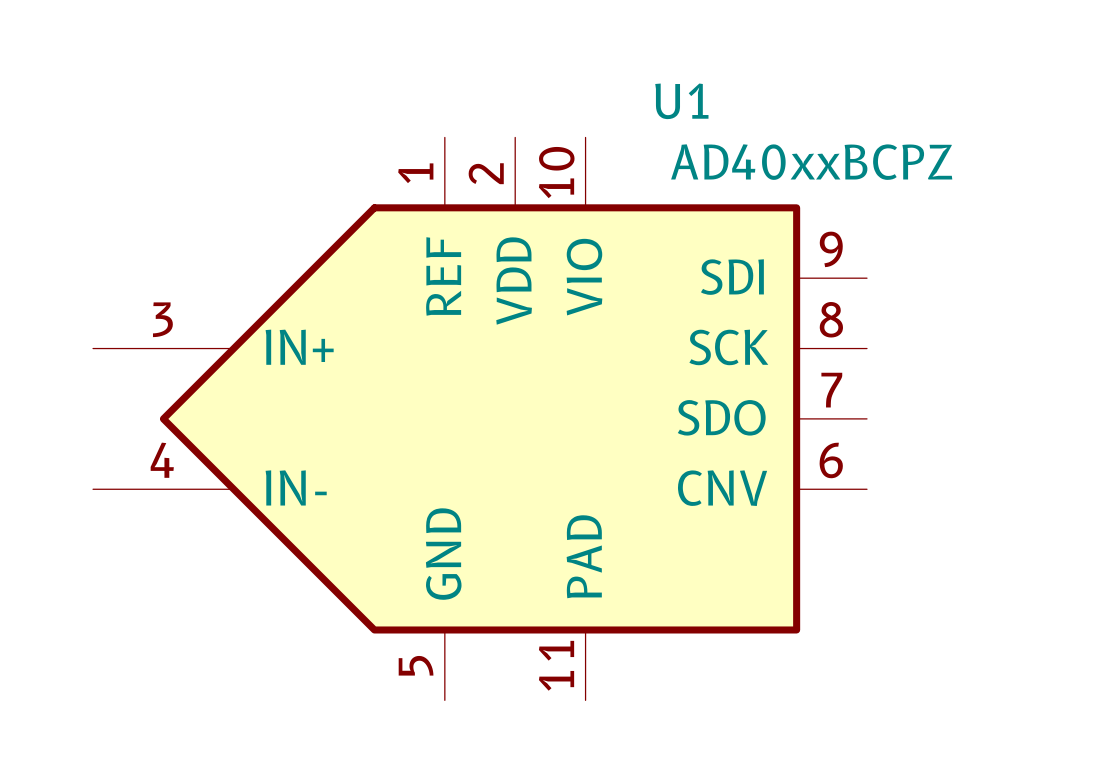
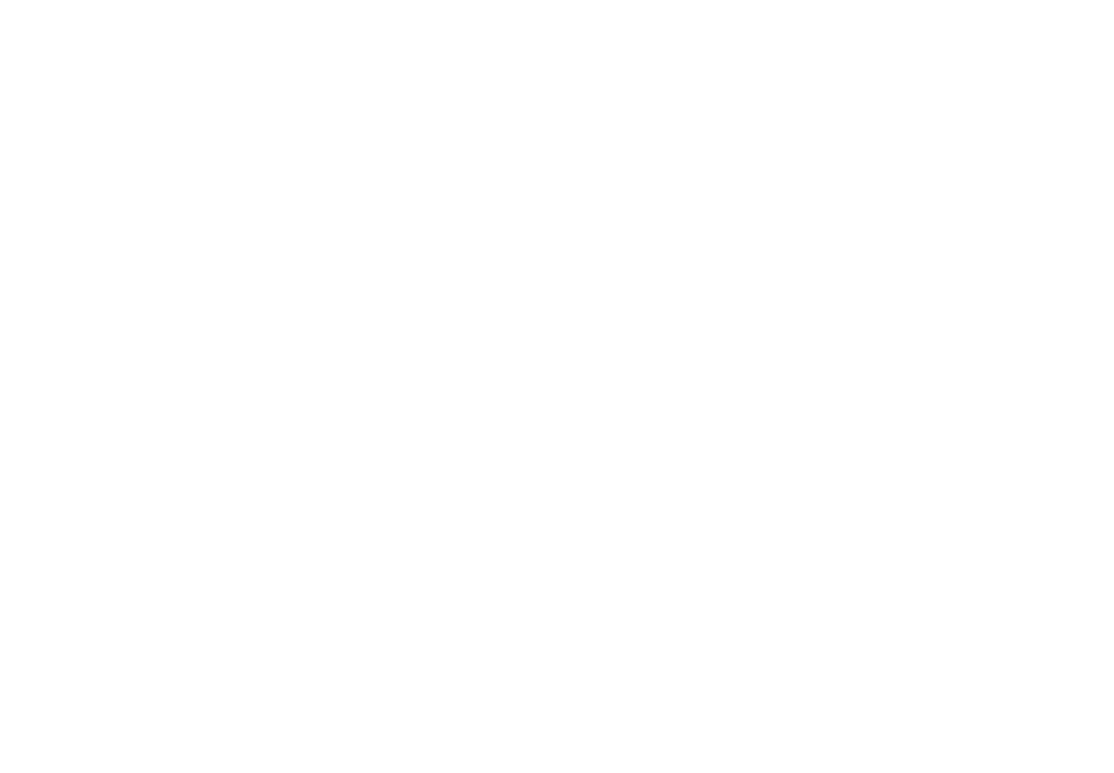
U1: AD40xxBCPZ (480, 418) -> none

